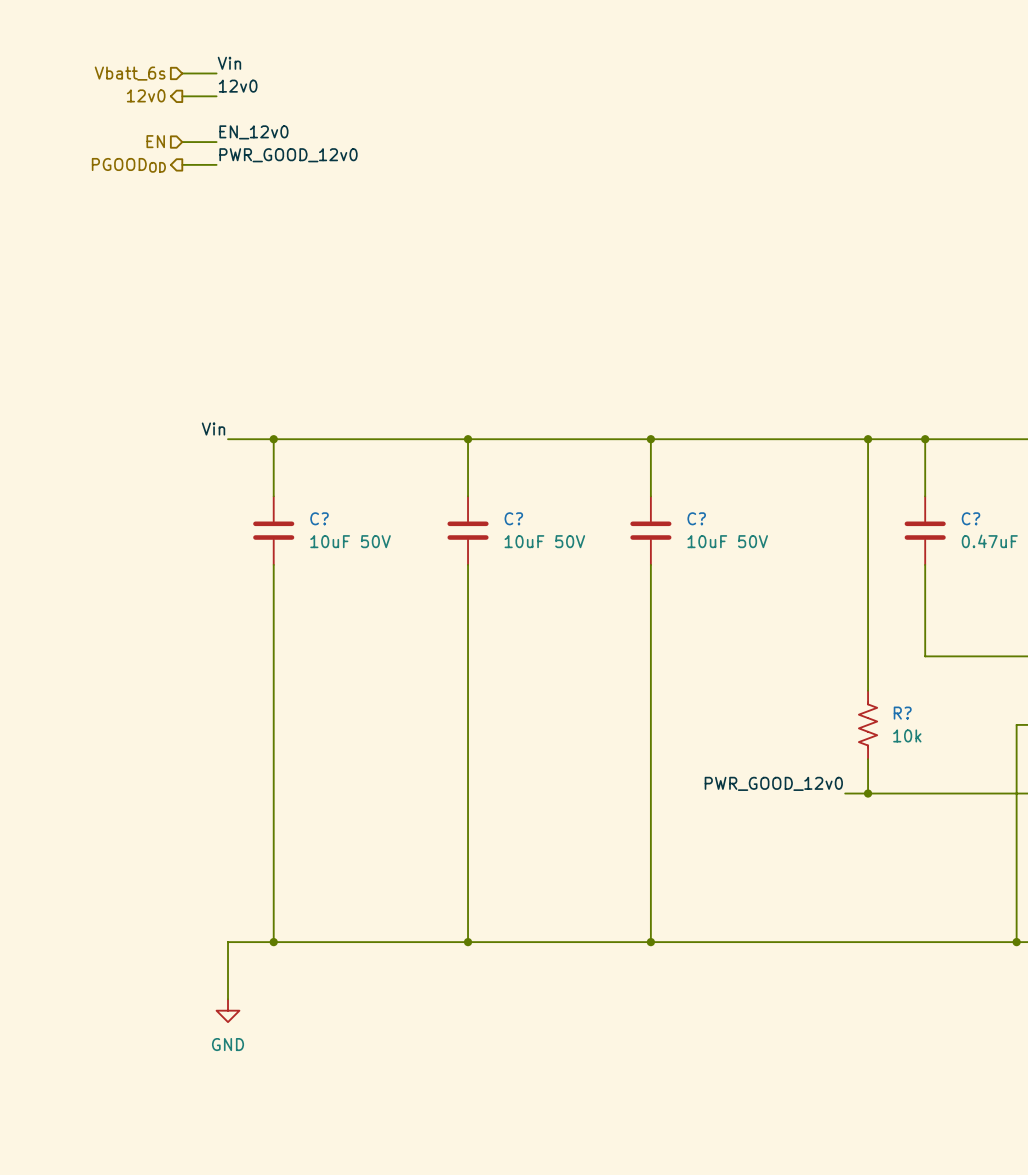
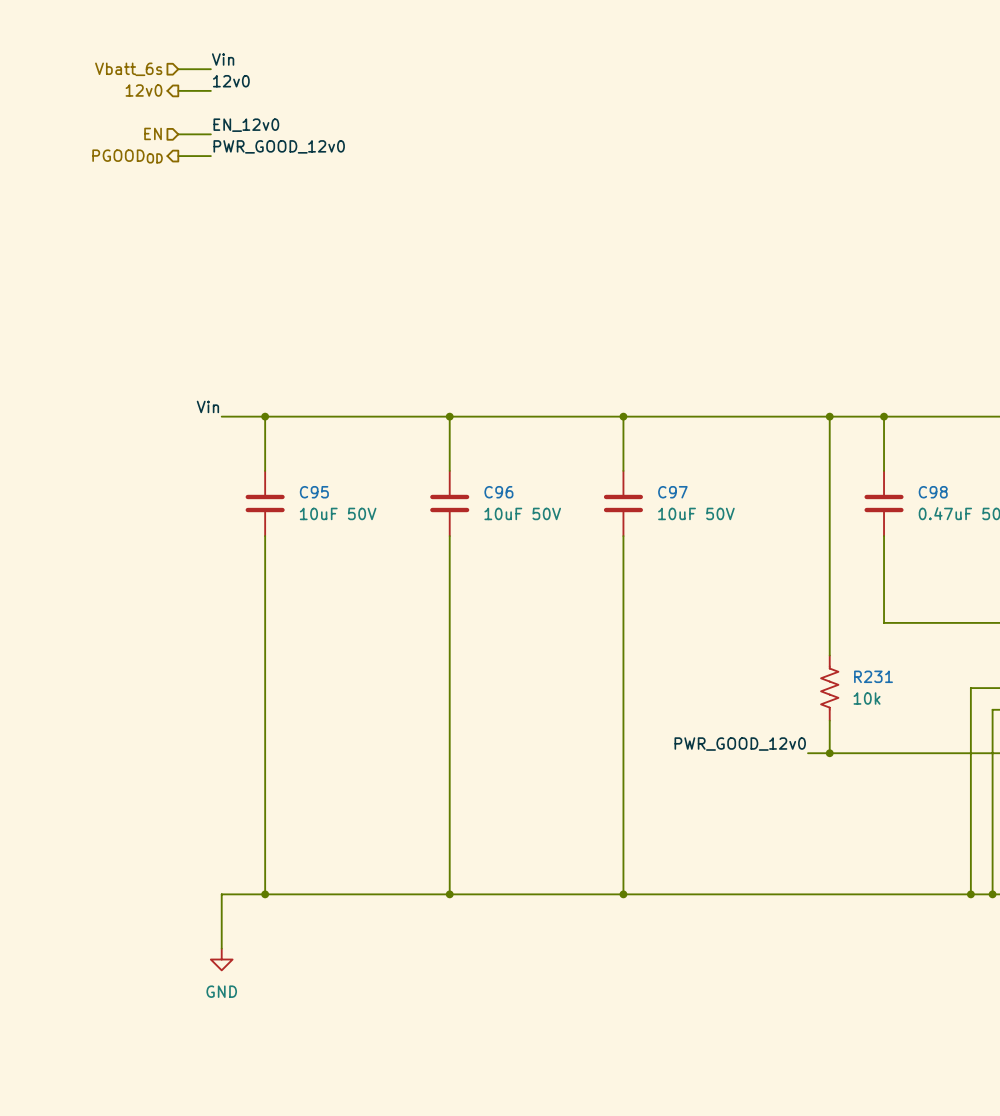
C? name: C? (319, 518) -> C95 (314, 492)
C? name: C? (513, 518) -> C96 (498, 492)
C? name: C? (696, 518) -> C97 (672, 492)
C? name: C? (971, 518) -> C98 (933, 492)
R? name: R? (902, 713) -> R231 (873, 676)

